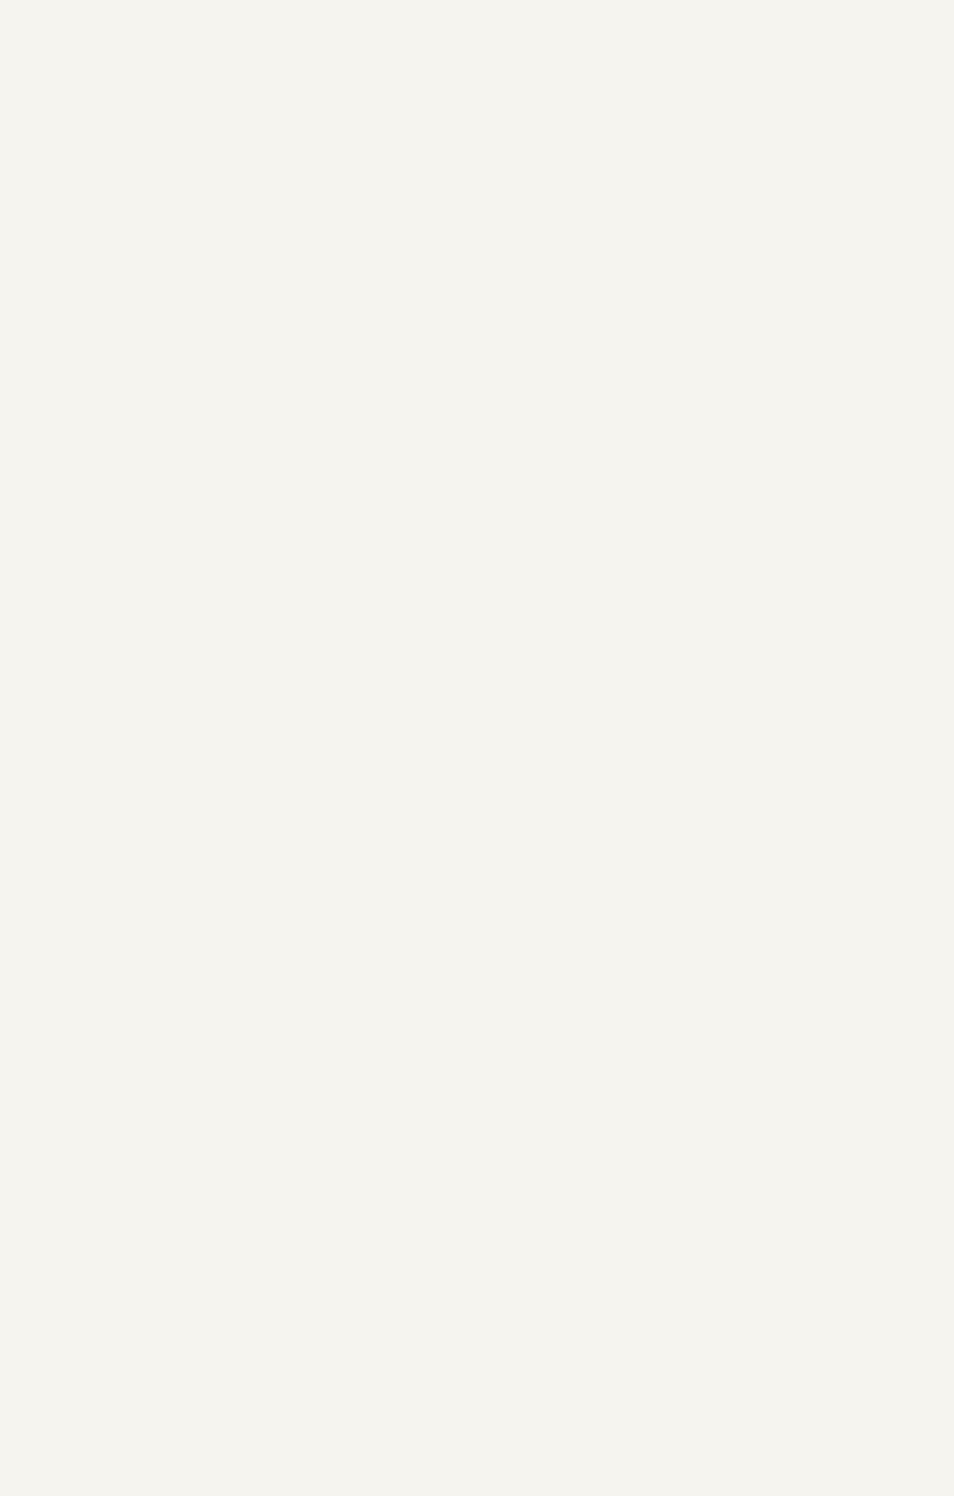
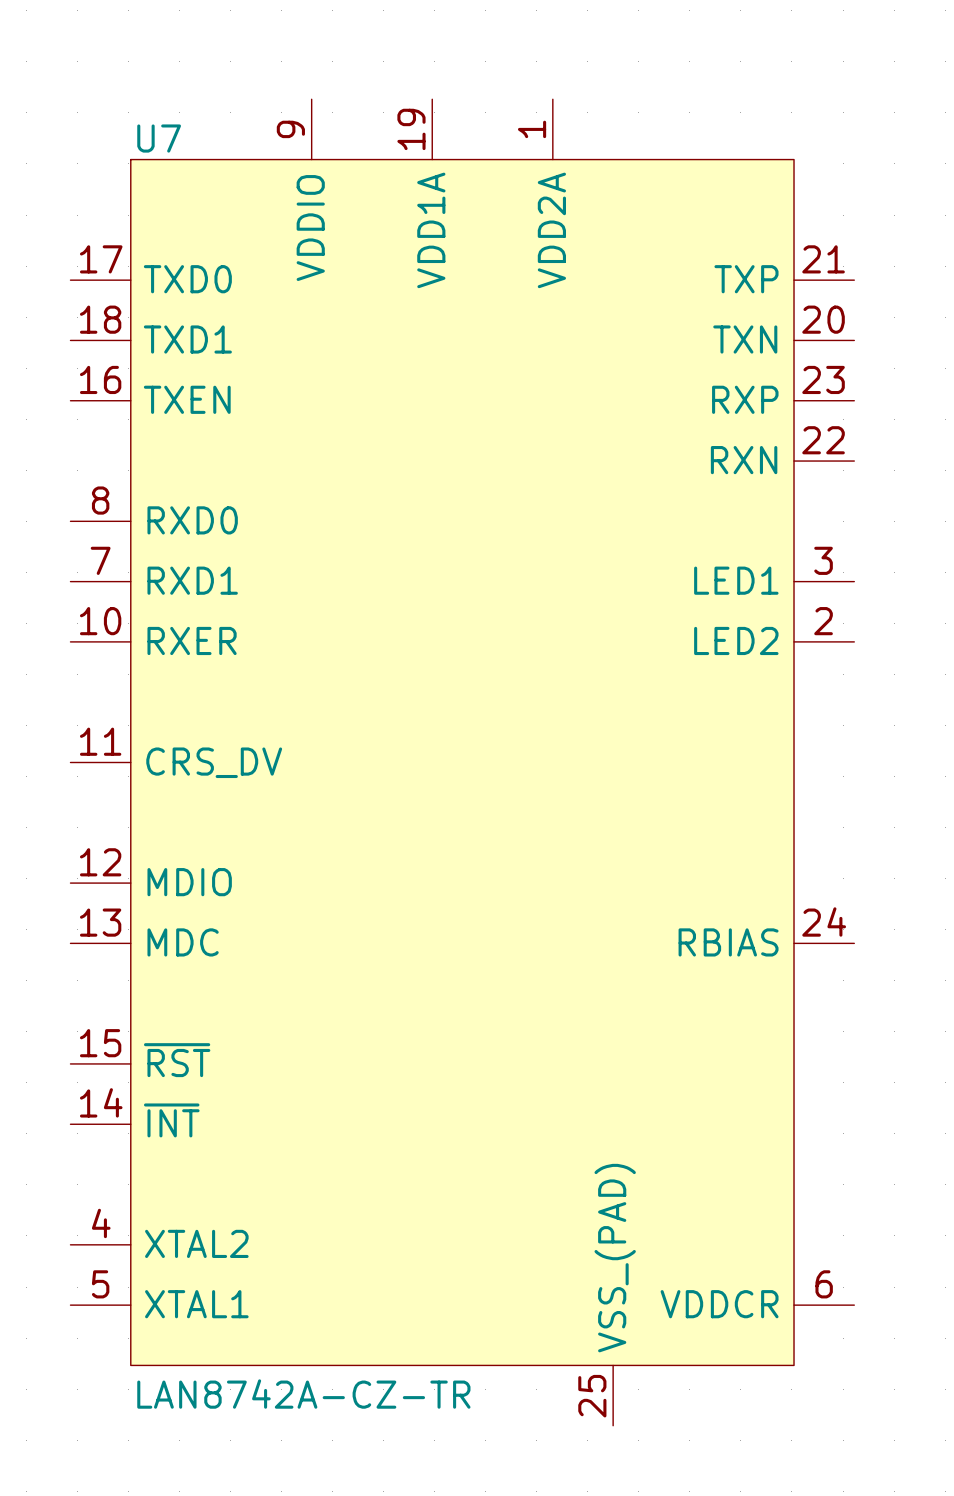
U7: none -> (462, 762)

